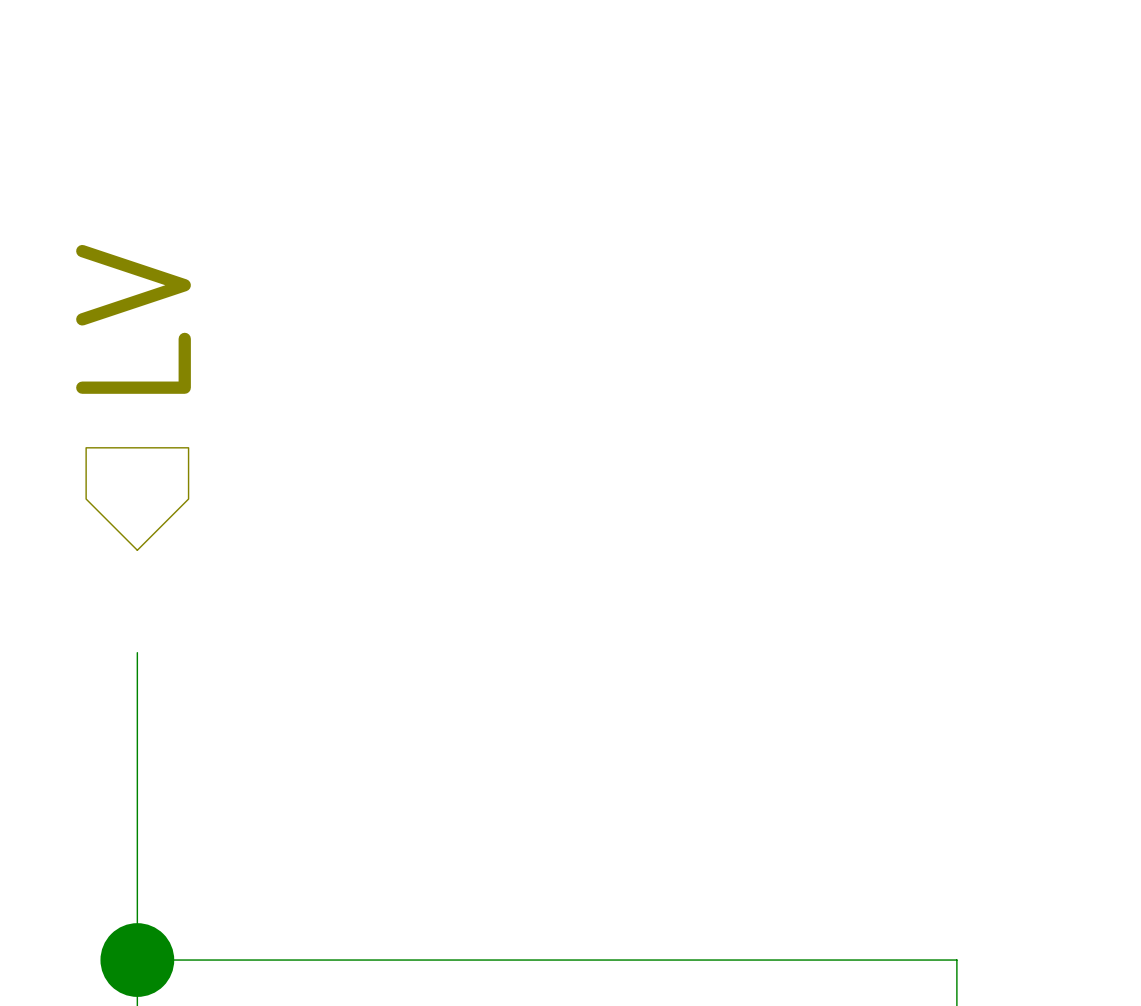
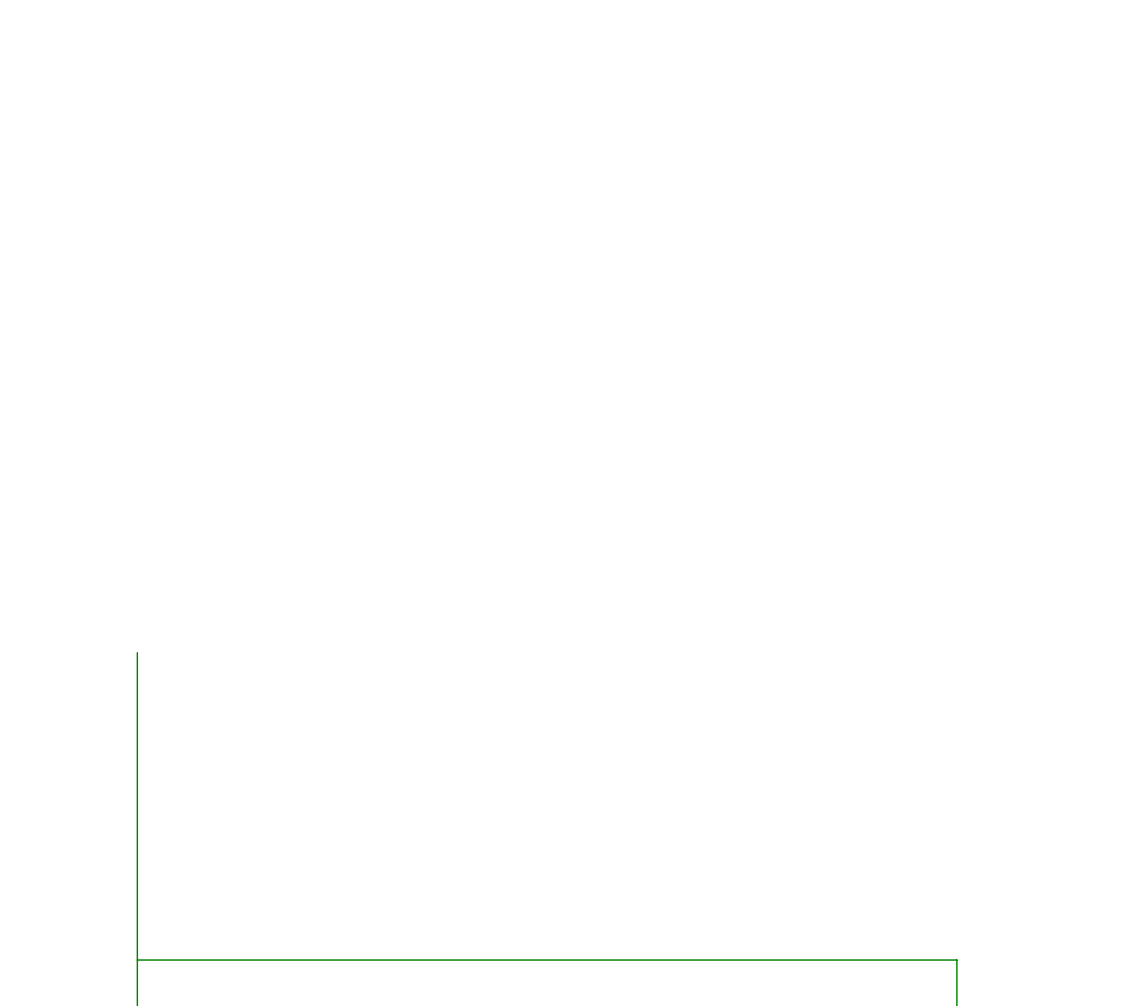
hierarchical label: LV (133, 319) -> none
junction: (137, 960) -> none

